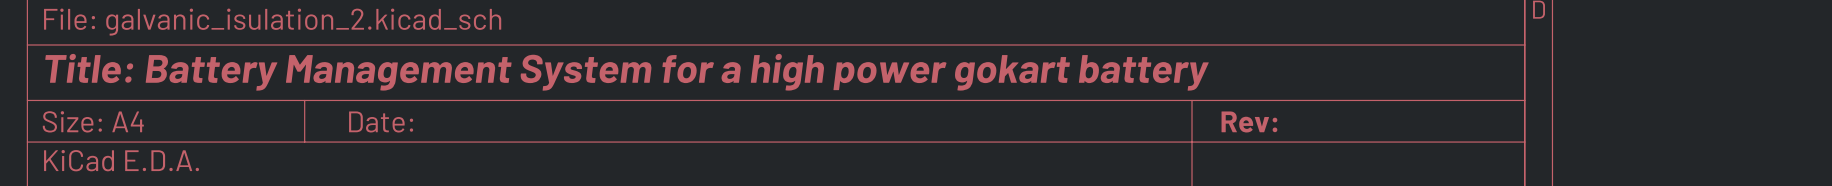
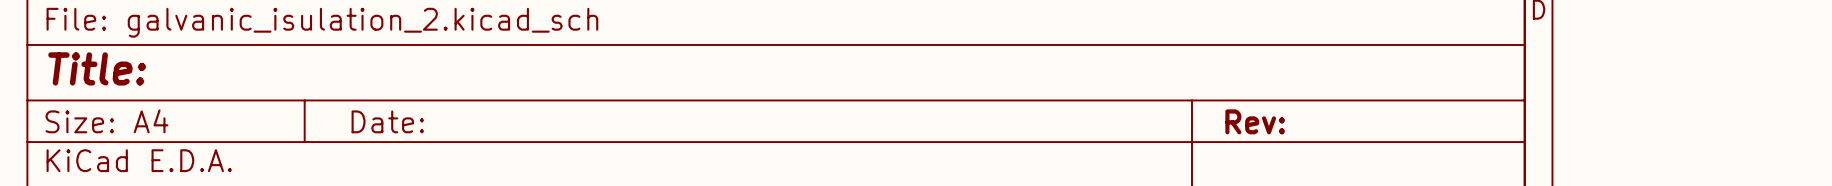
title block: Title: Battery Management System for a high power gokart battery (627, 72) -> Title: (97, 68)

